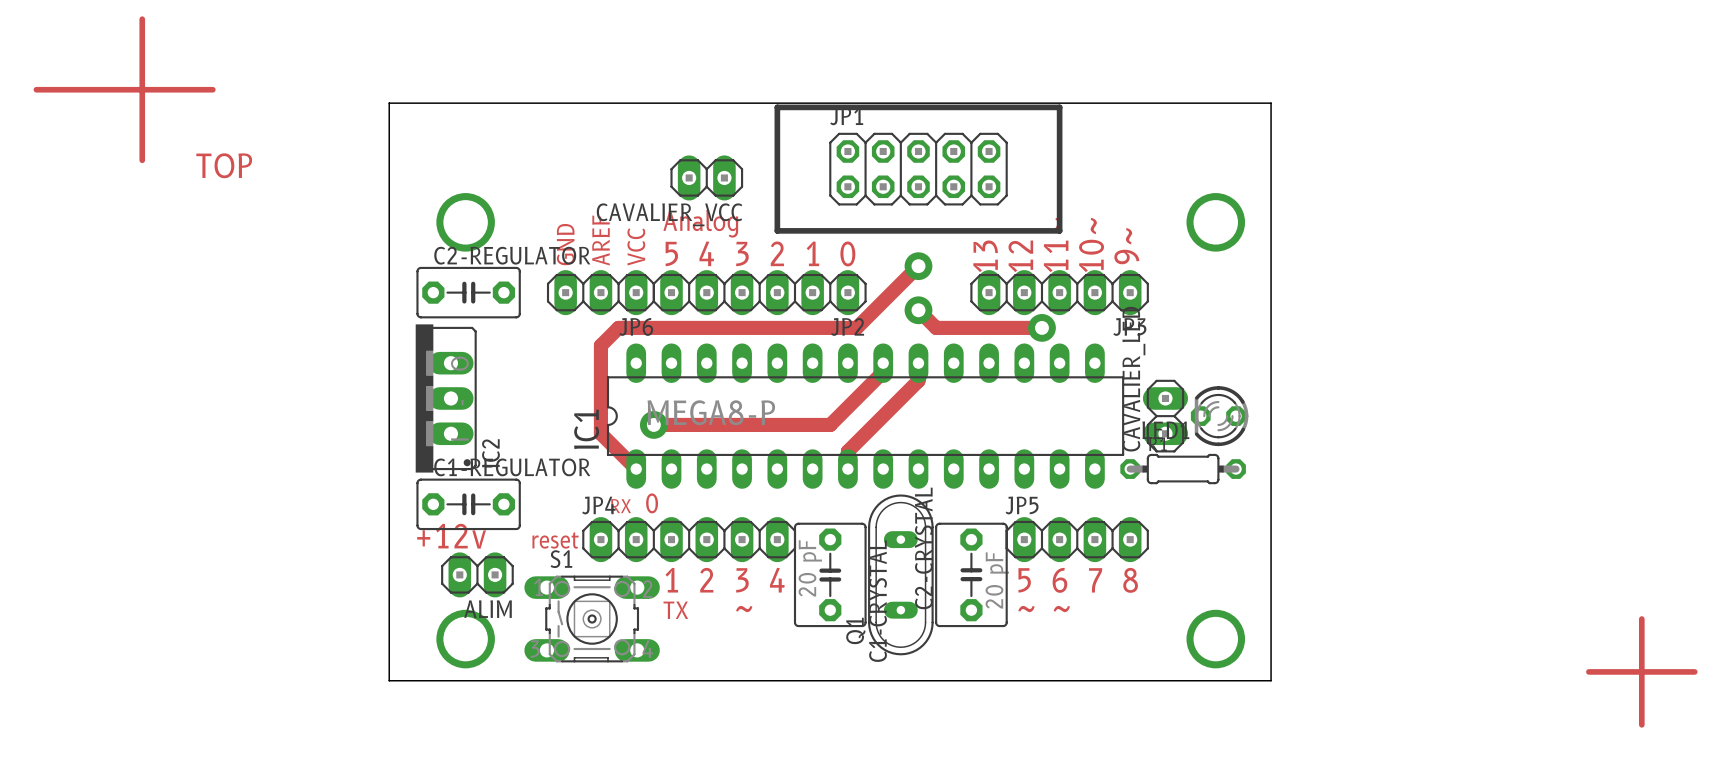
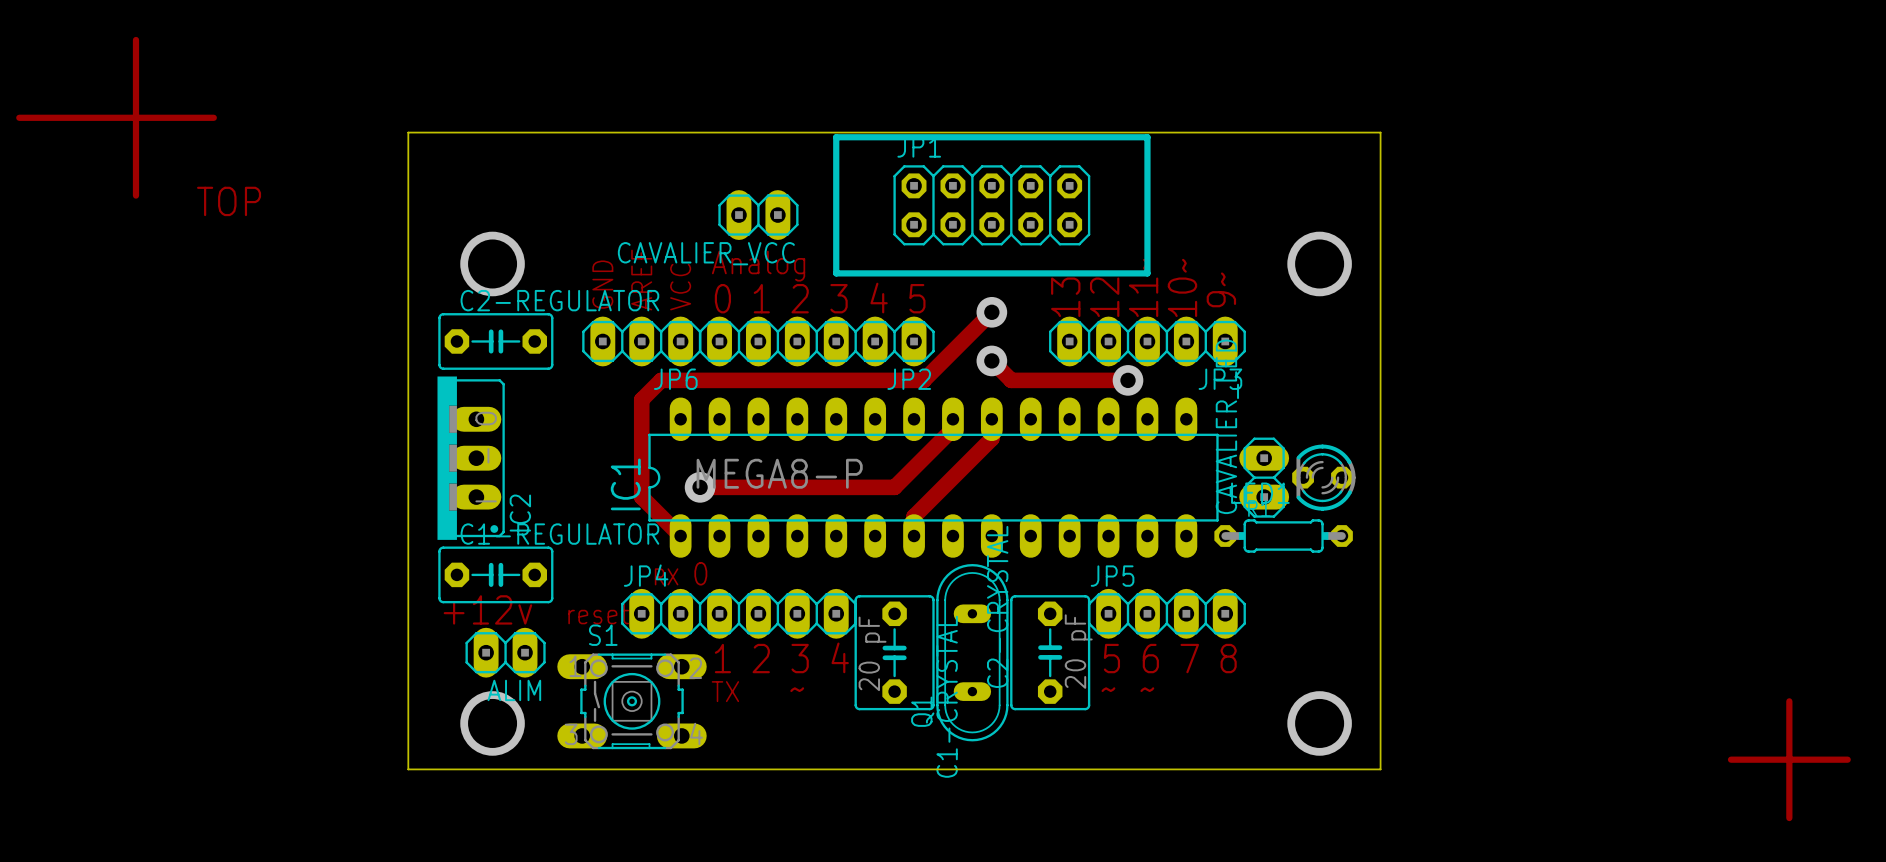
text: 5 (671, 253) -> 0 (722, 298)
text: 4 (706, 253) -> 1 (761, 298)
text: 3 (742, 253) -> 2 (800, 298)
text: 2 (777, 253) -> 3 (839, 298)
text: 1 (812, 253) -> 4 (879, 298)
text: 0 (847, 253) -> 5 (917, 298)

